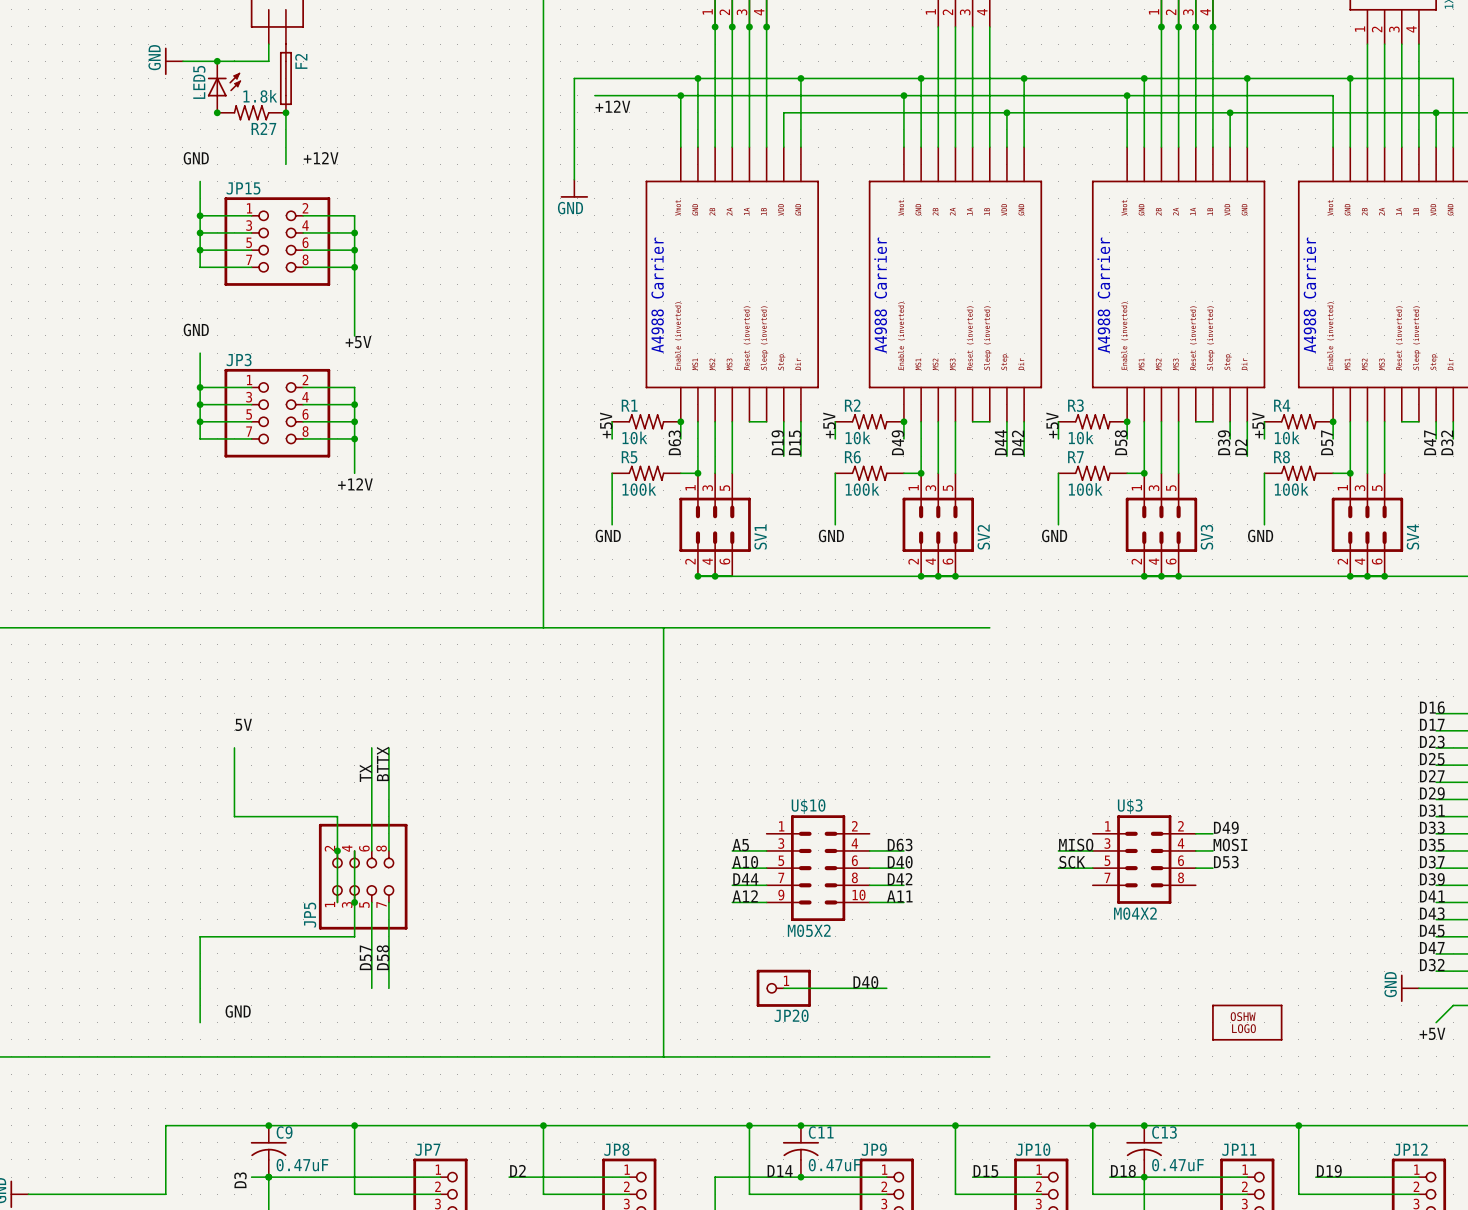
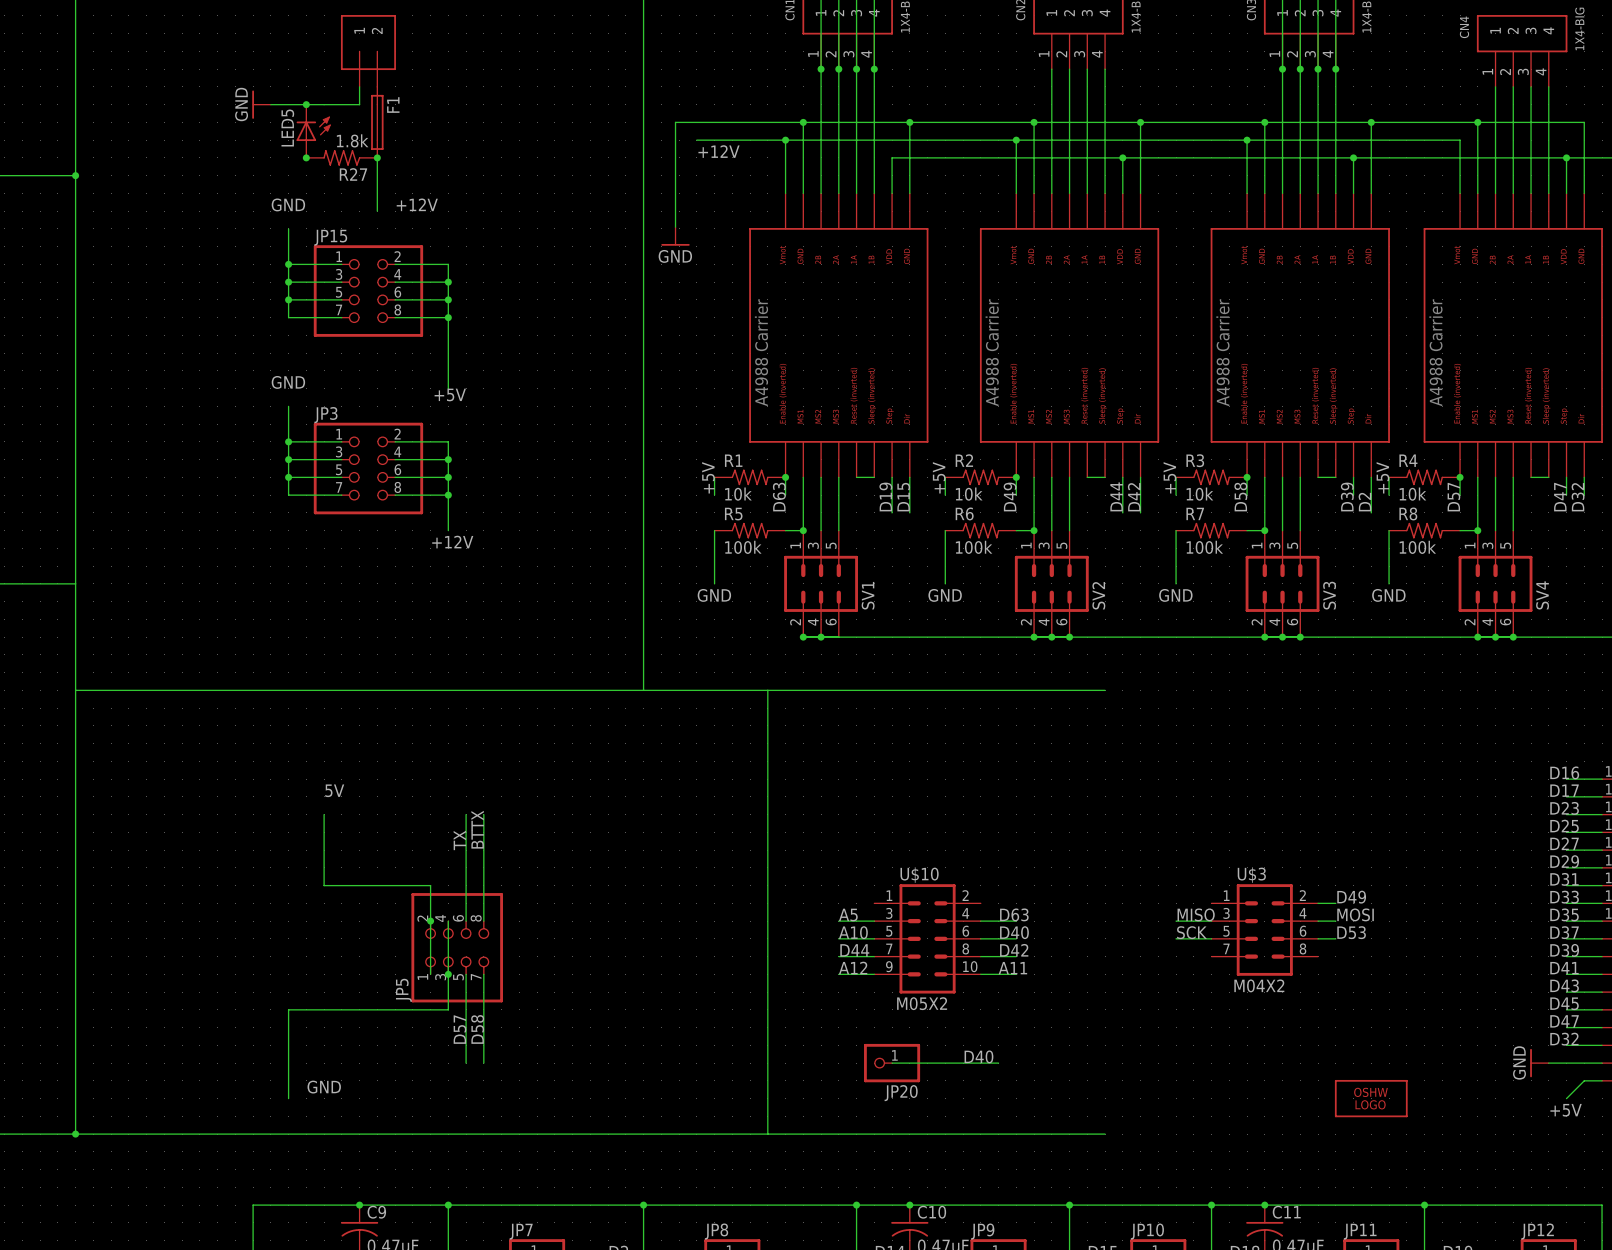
F2 name: F2 (301, 61) -> F1 (393, 105)
C11 name: C11 (821, 1132) -> C10 (931, 1212)
C13 name: C13 (1164, 1132) -> C11 (1286, 1212)

